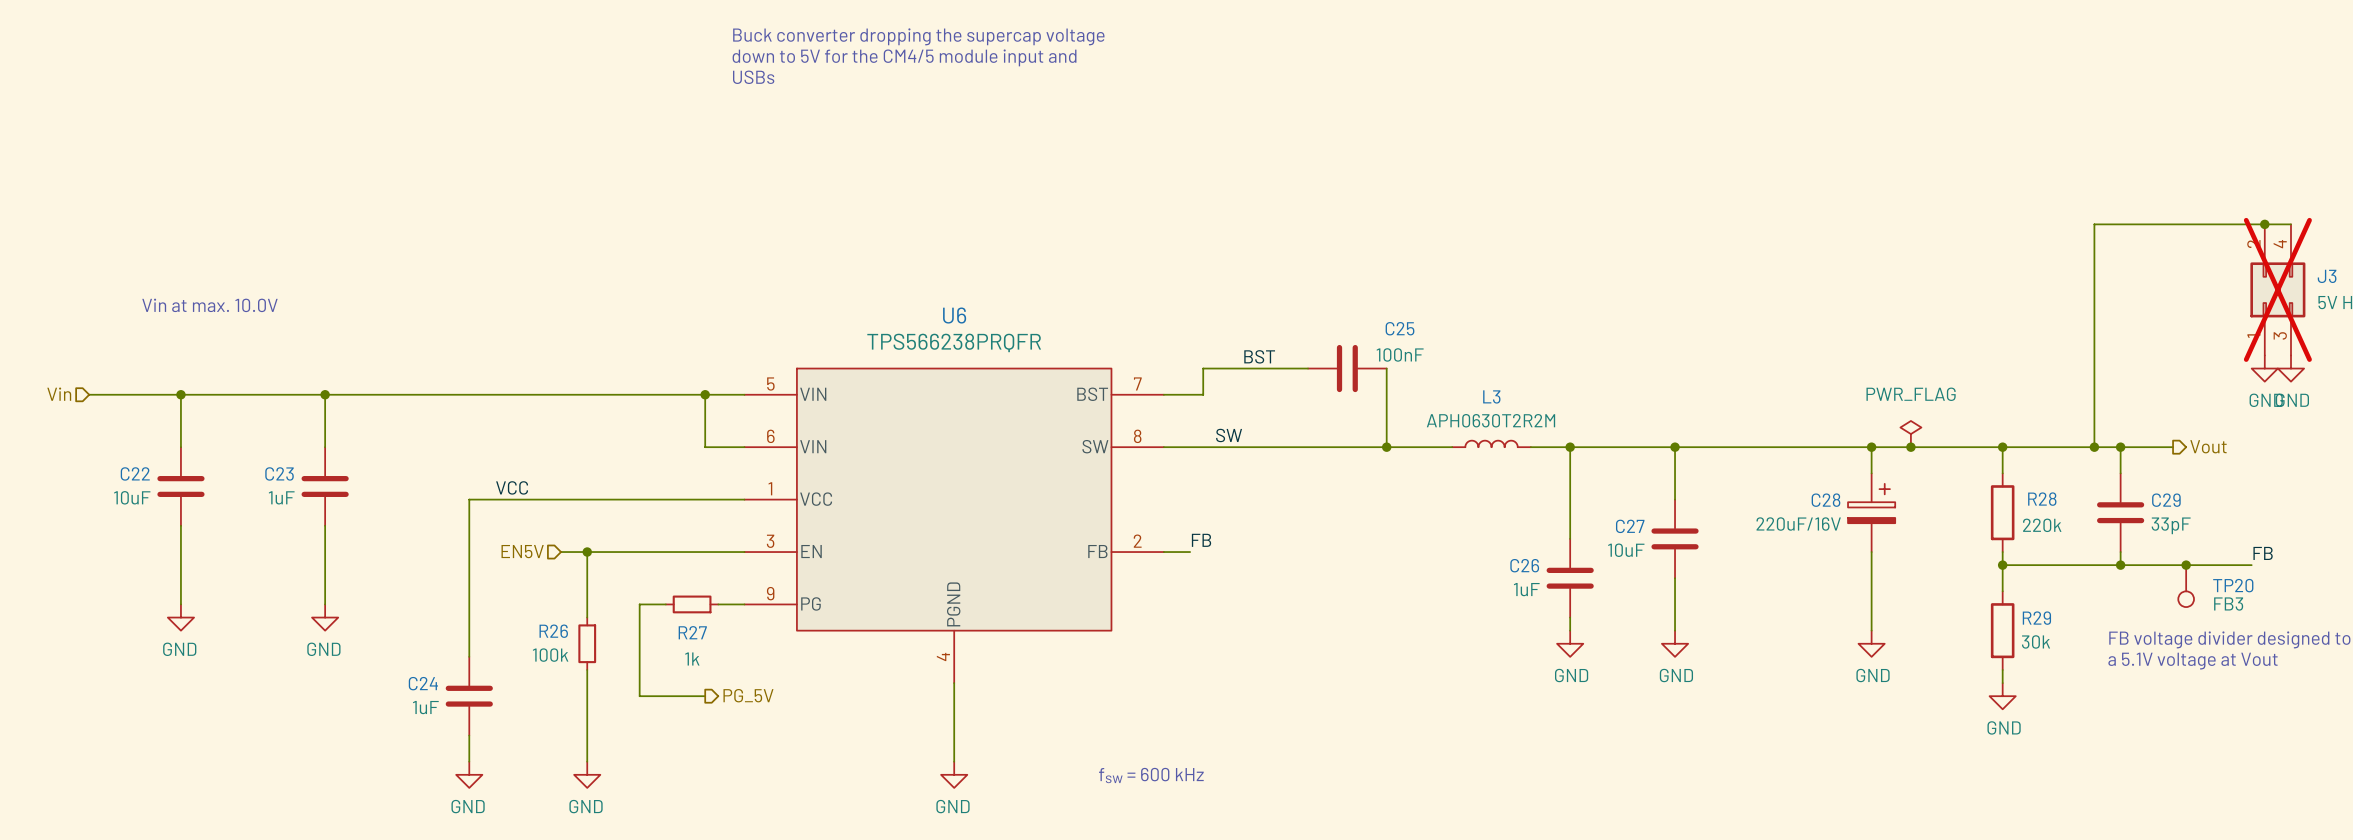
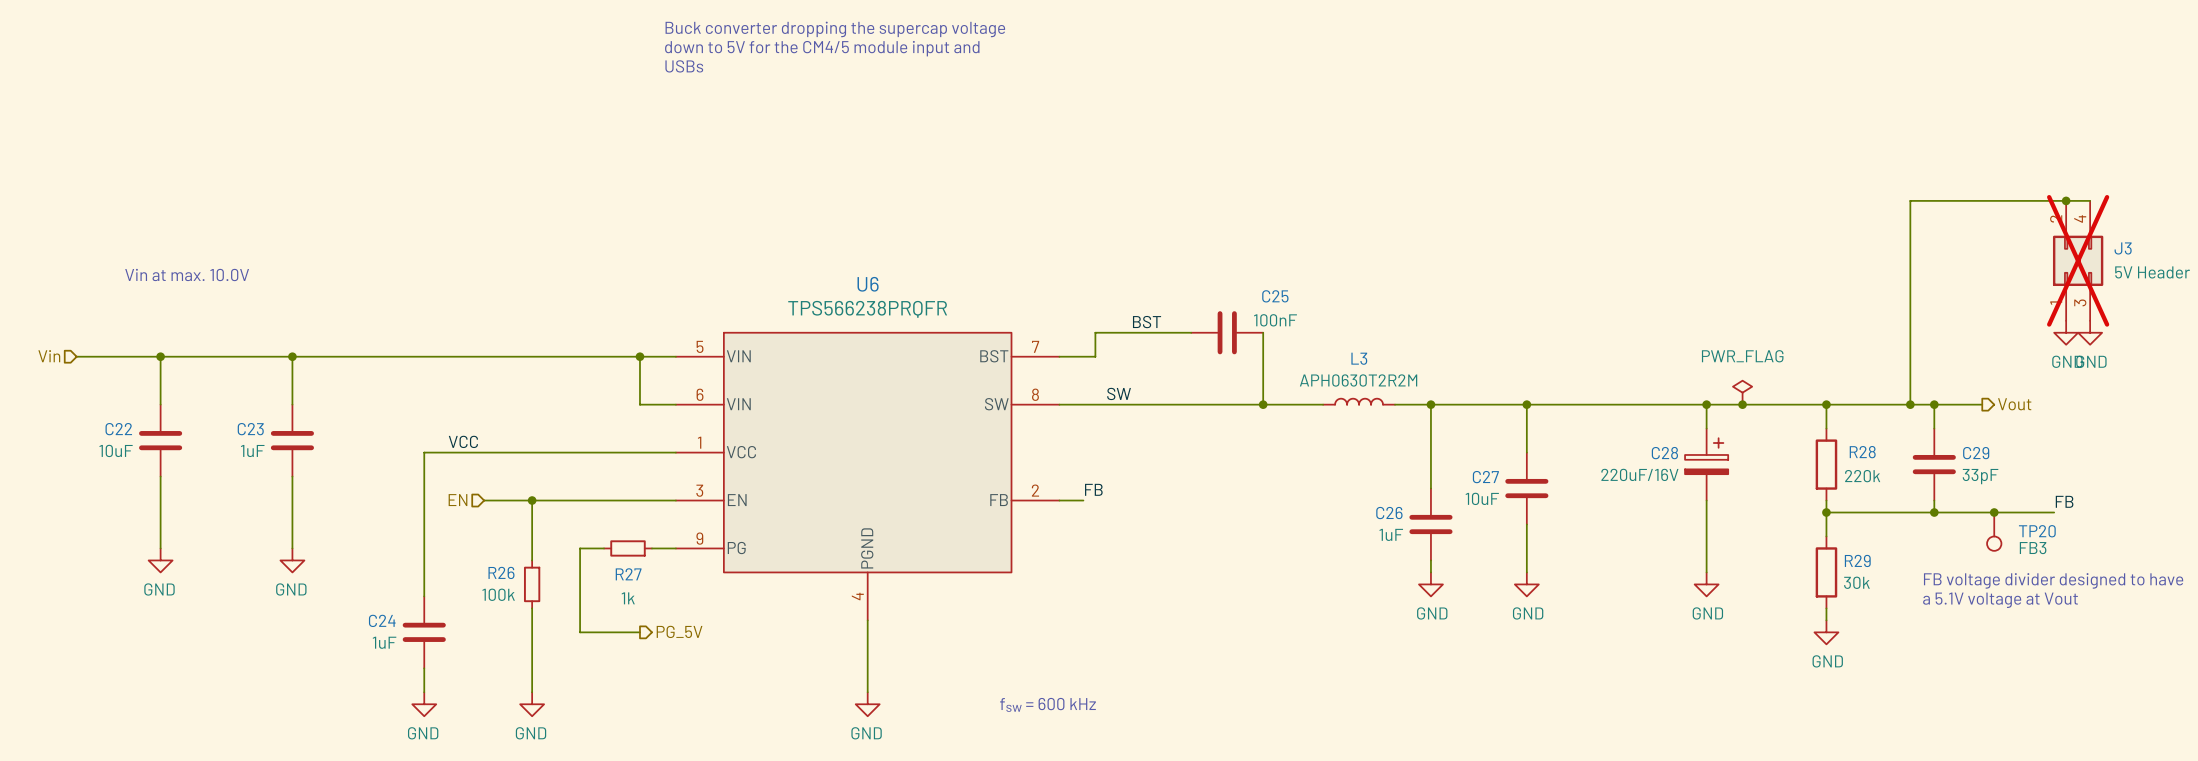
hierarchical label: EN5V (522, 551) -> EN (458, 500)
wire: none -> (484, 500) (508, 500)

